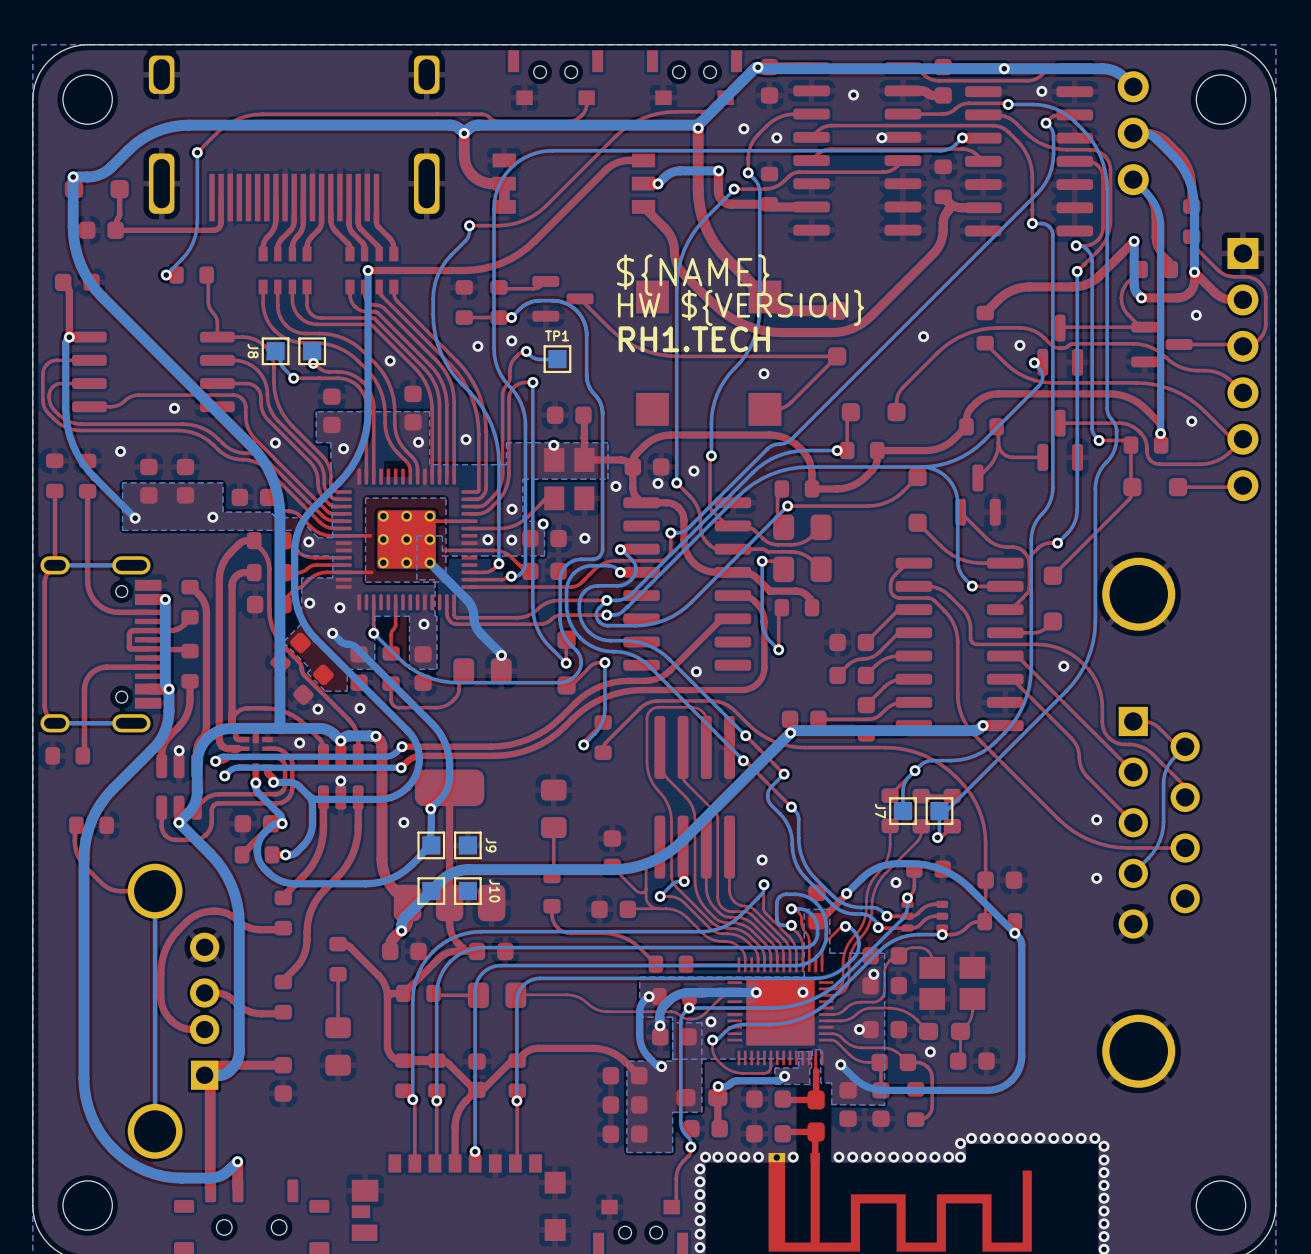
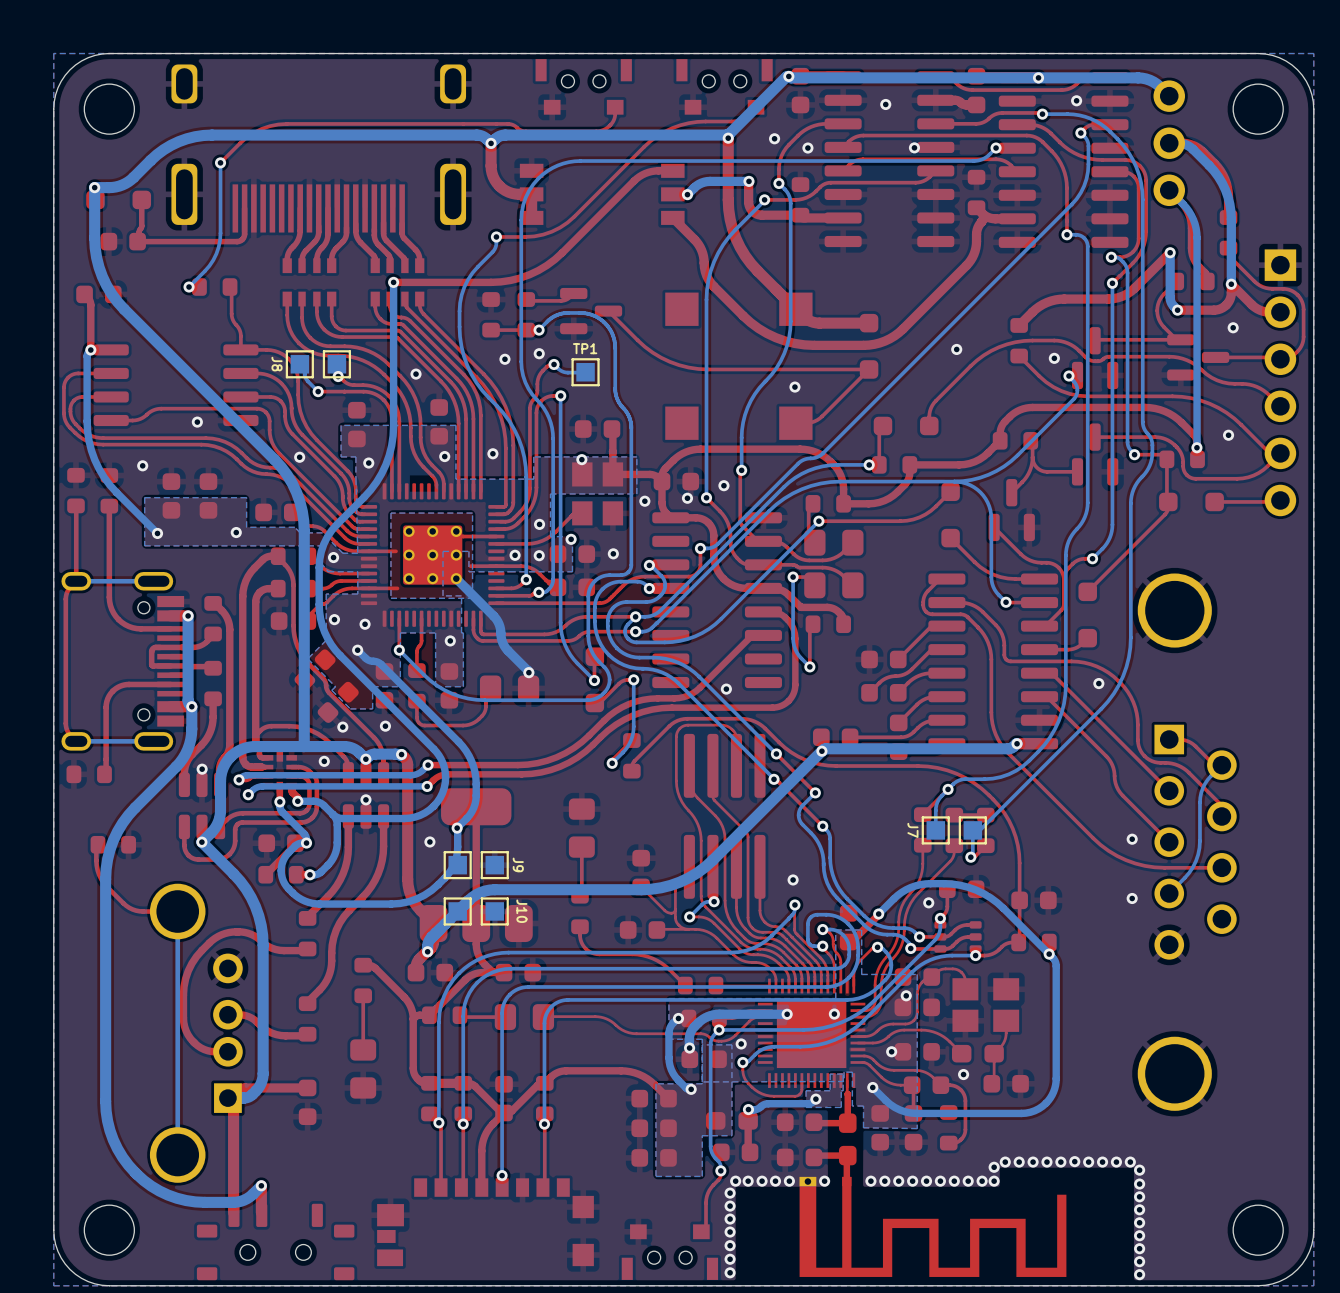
text: ${NAME} (693, 275) -> none
text: HW ${VERSION} (741, 307) -> none
text: RH1.TECH (694, 339) -> none

